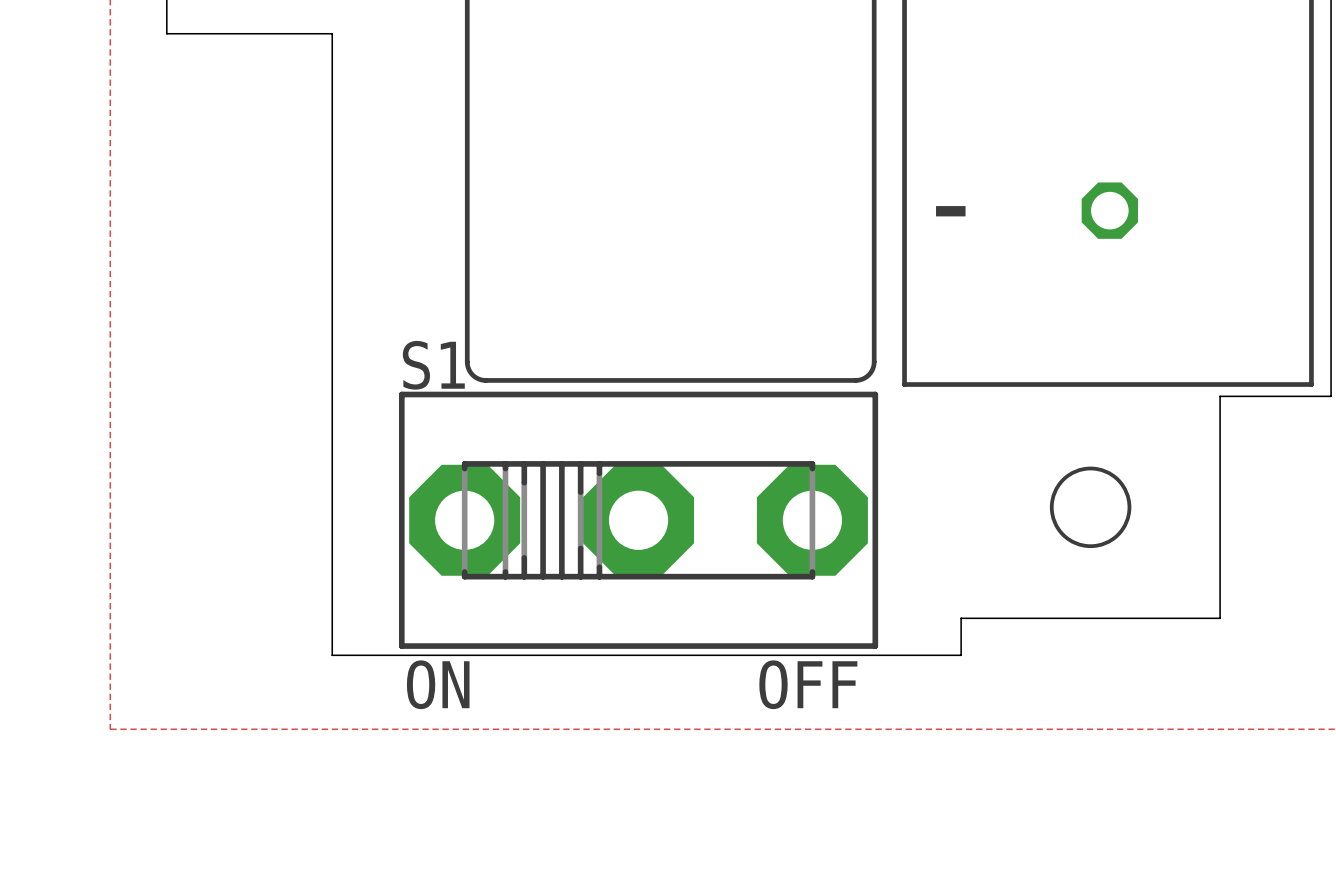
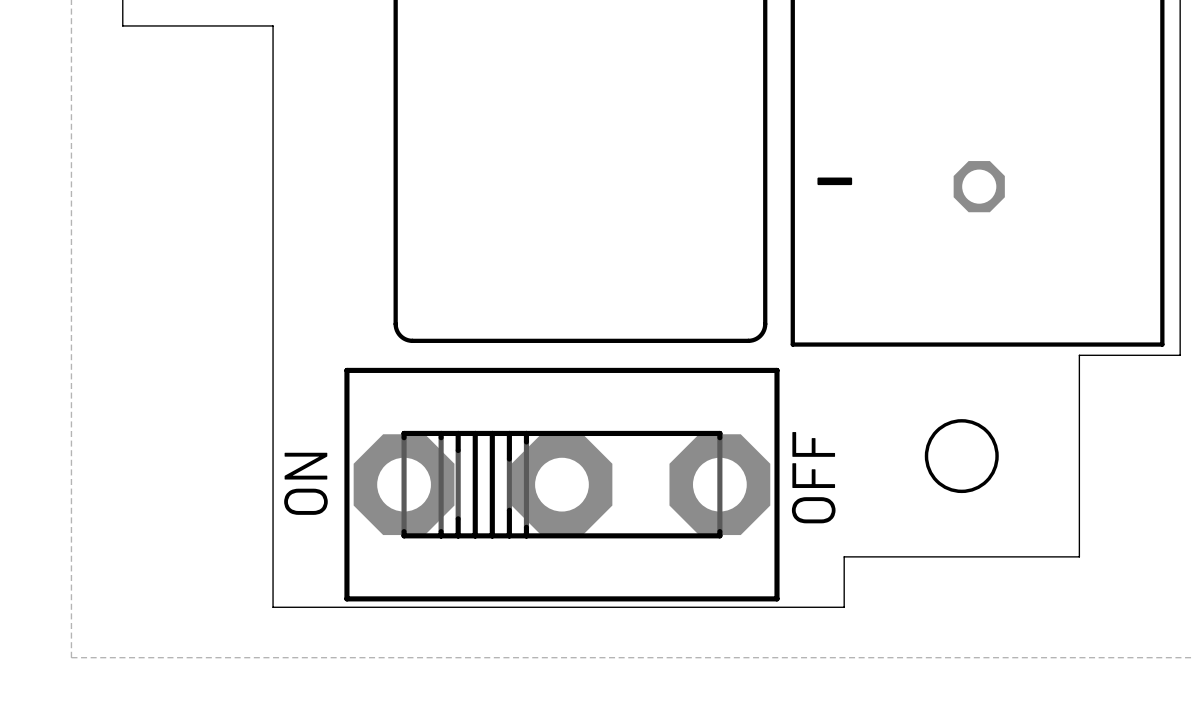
S1 name: S1 (433, 365) -> none
S1 position: (638, 520) -> (561, 484)
board edge: (332, 655) (961, 655) -> (273, 590) (273, 607) (844, 607) (844, 590)
S1 text rotation: 0° (438, 684) -> 90° counterclockwise (305, 483)
S1 text position: ON (438, 684) -> ON (305, 483)
S1 text rotation: 0° (808, 684) -> 90° counterclockwise (813, 477)
S1 text position: OFF (808, 684) -> OFF (813, 477)

